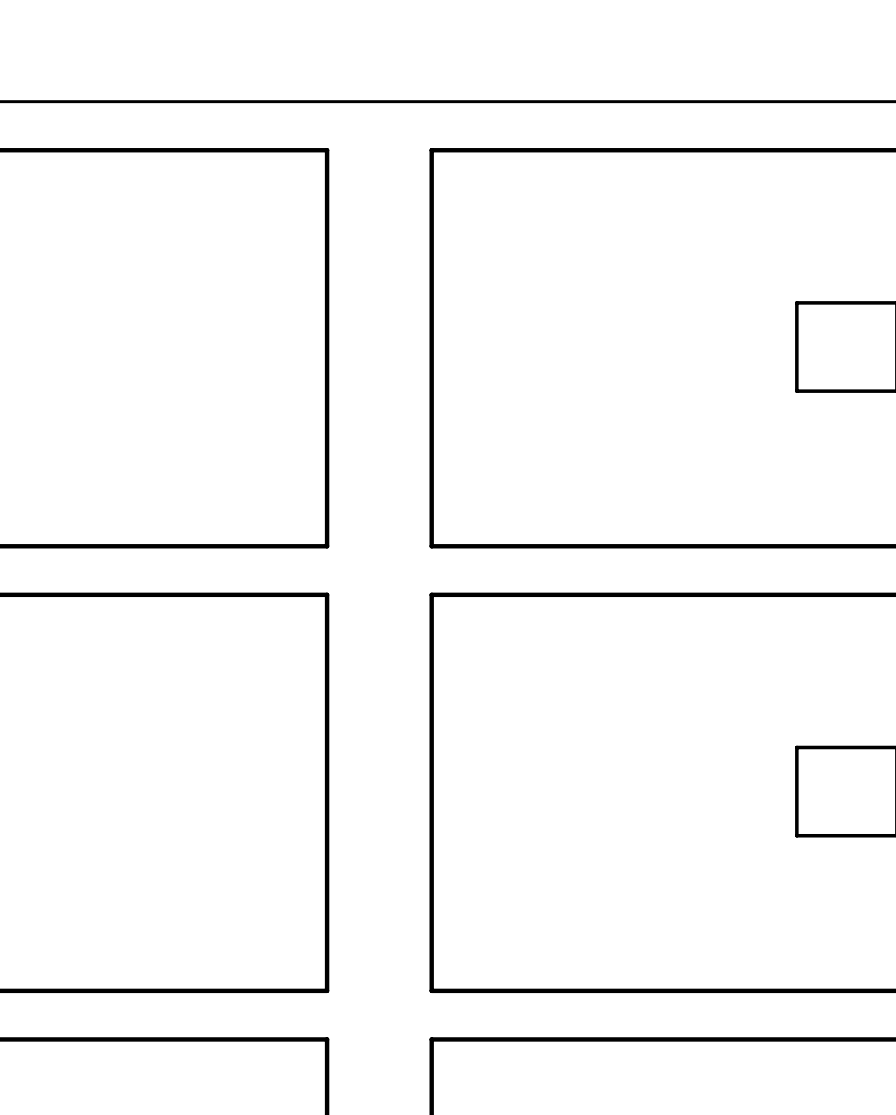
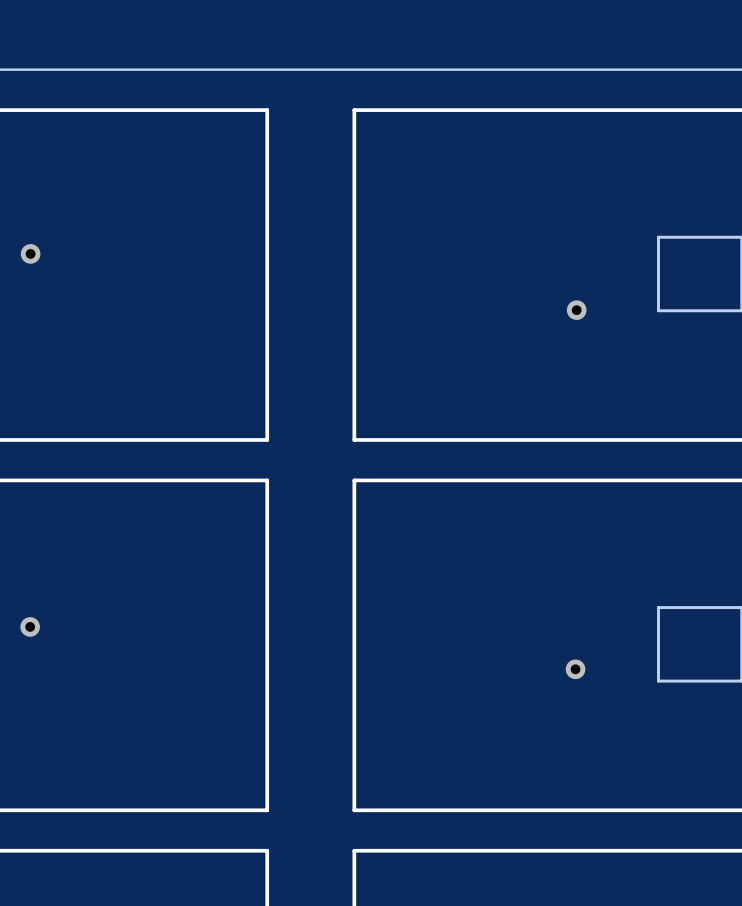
via: none -> (30, 253)
via: none -> (576, 310)
via: none -> (30, 626)
via: none -> (575, 669)

